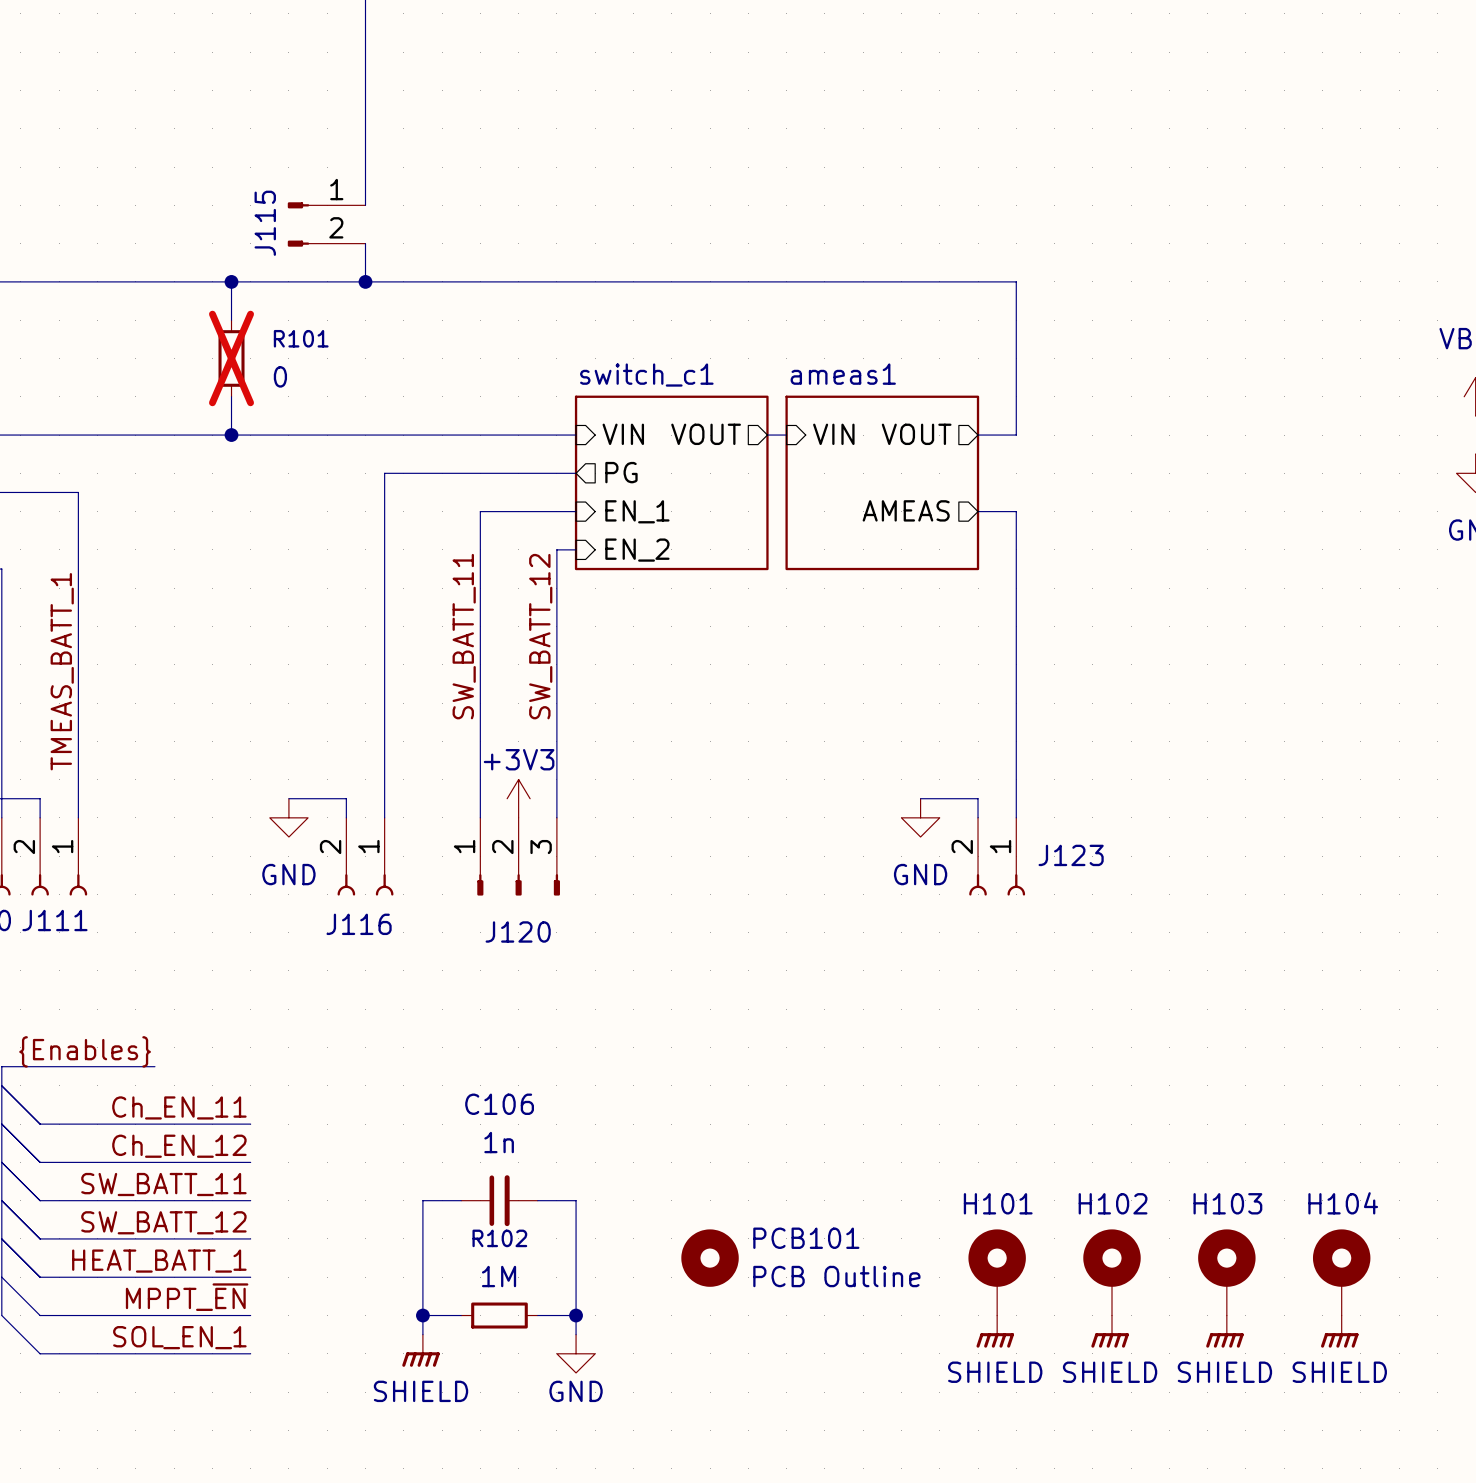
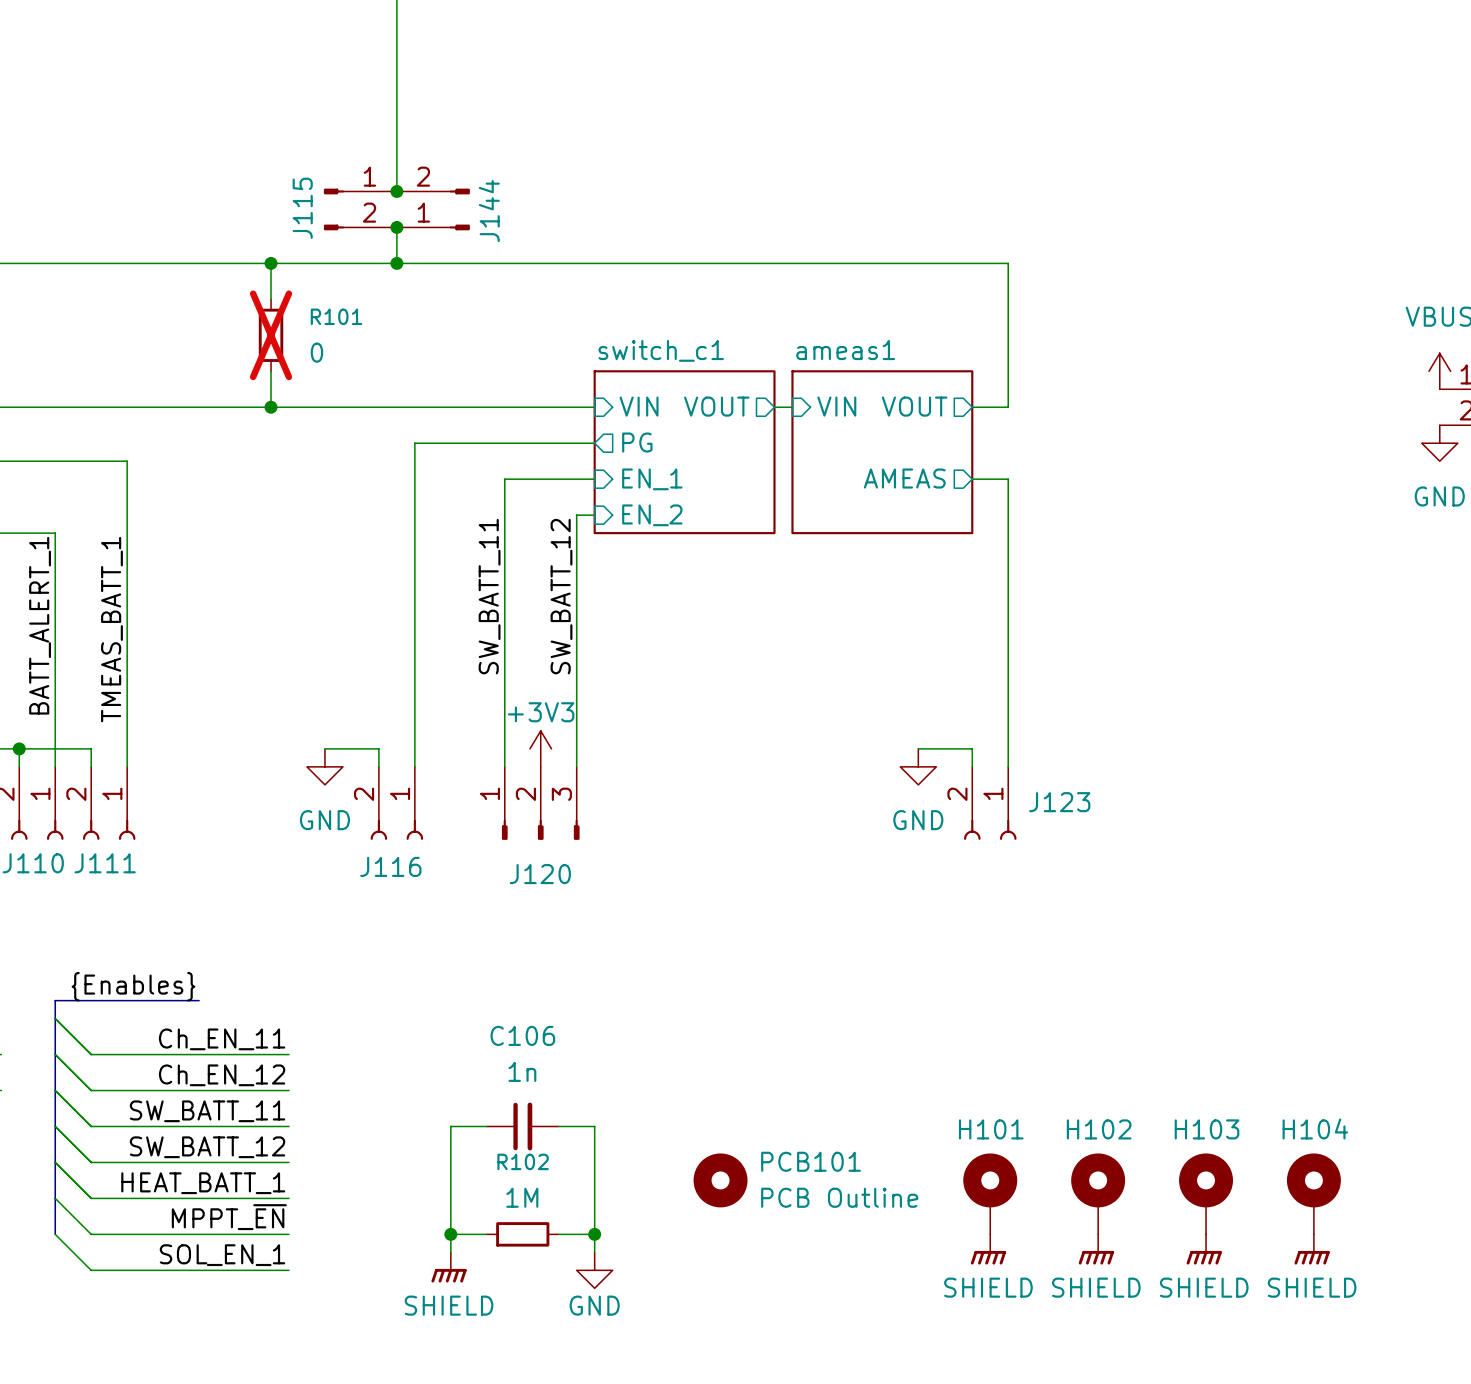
junction: none -> (396, 191)
J144: none -> (433, 209)
junction: none -> (396, 227)

